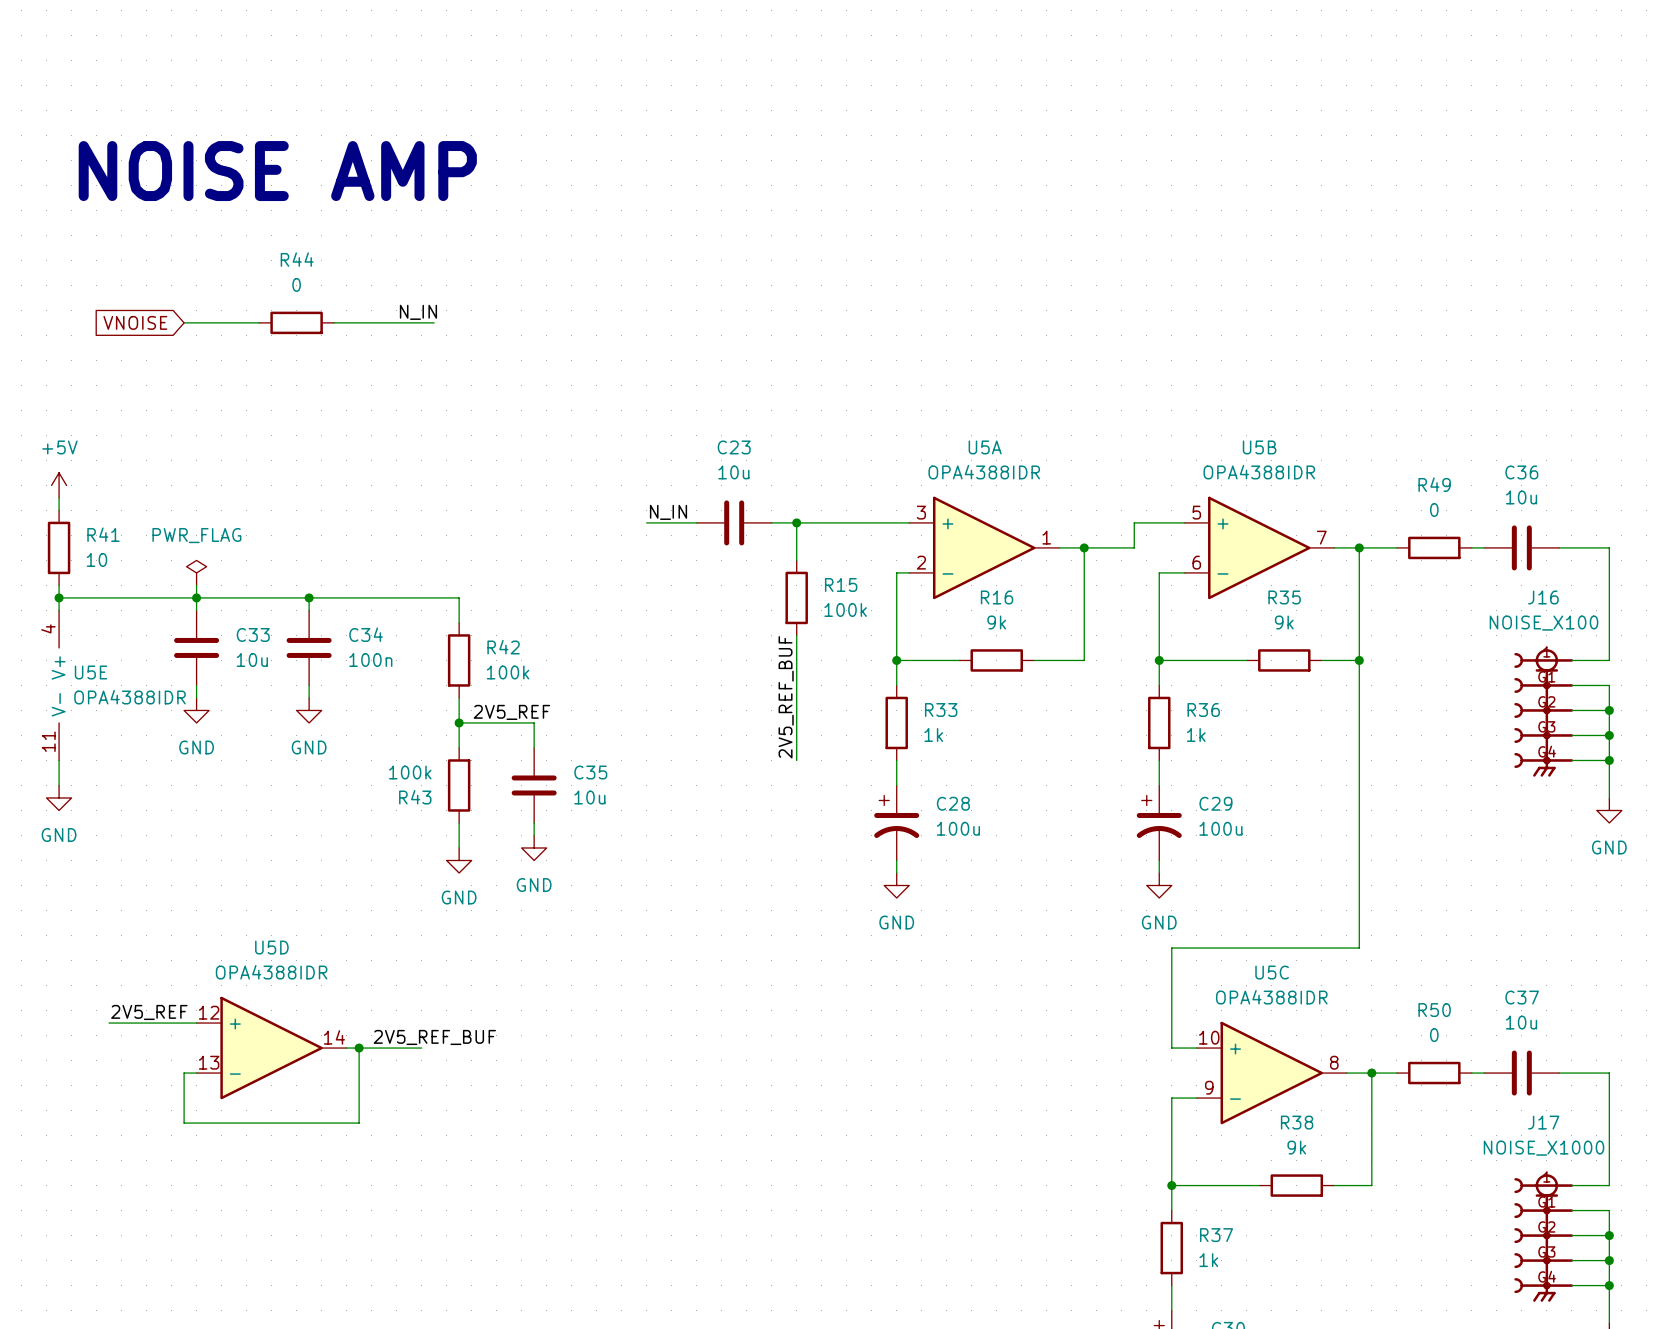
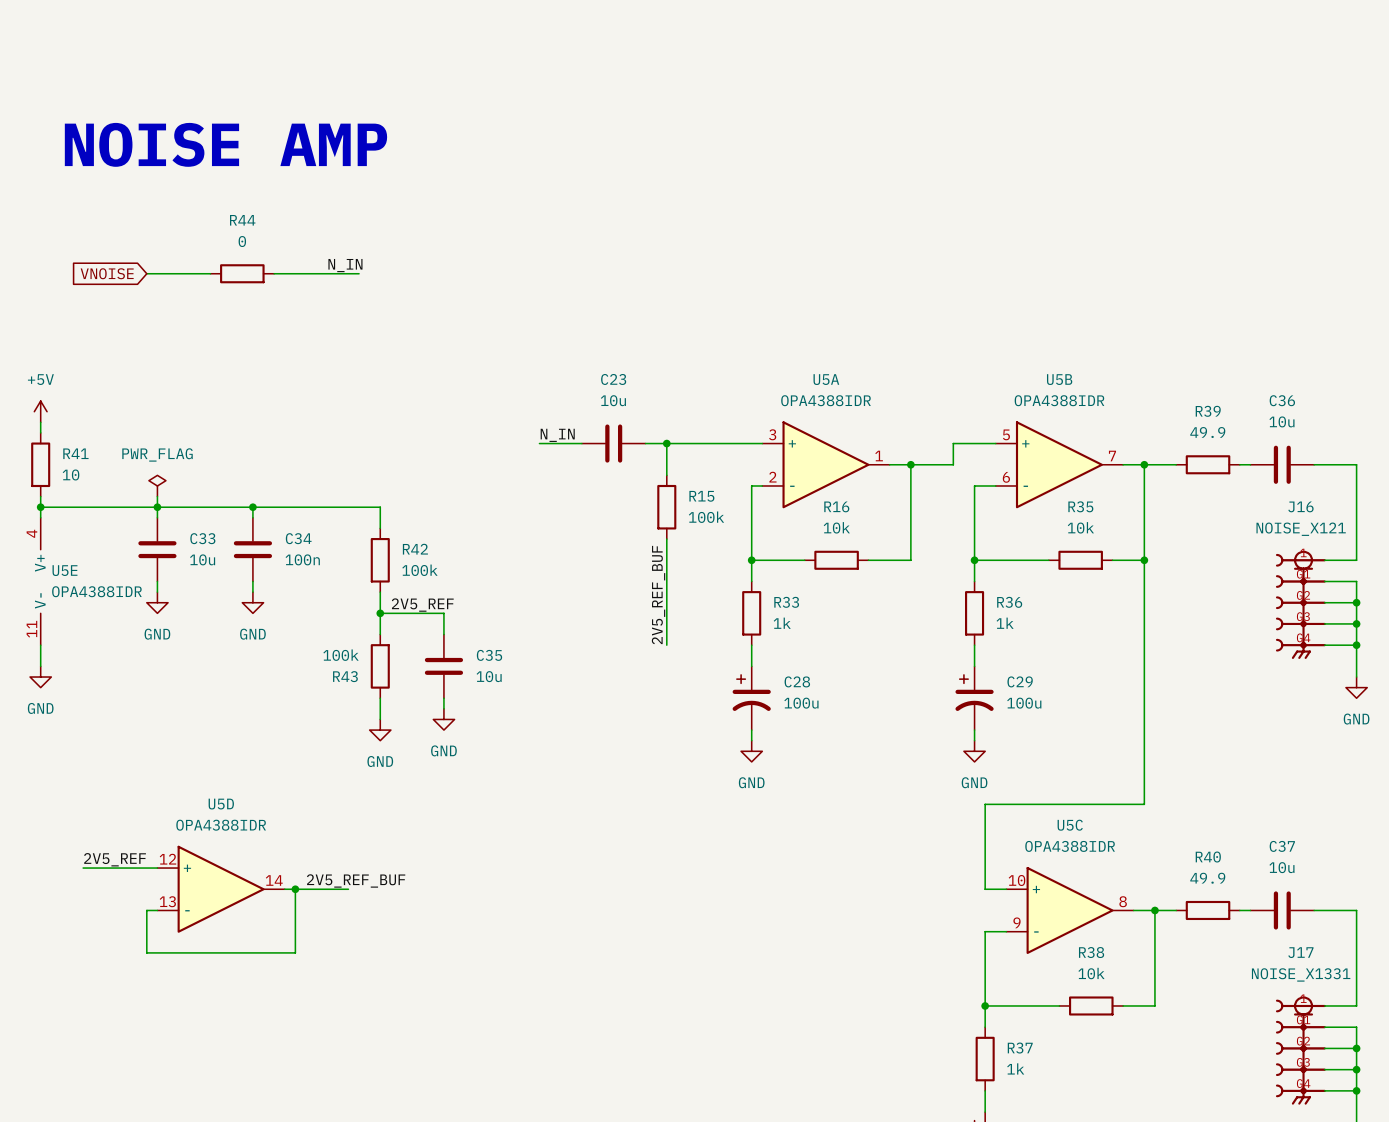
R49 name: R49 (1434, 484) -> R39 (1208, 411)
R49 value: 0 (1434, 509) -> 49.9 (1207, 432)
R16 value: 9k (996, 622) -> 10k (836, 527)
R35 value: 9k (1284, 622) -> 10k (1080, 527)
J16 value: NOISE_X100 (1544, 623) -> NOISE_X121 (1301, 529)
R50 name: R50 (1434, 1010) -> R40 (1208, 857)
R50 value: 0 (1434, 1035) -> 49.9 (1207, 878)
R38 value: 9k (1296, 1147) -> 10k (1091, 973)
J17 value: NOISE_X1000 (1544, 1148) -> NOISE_X1331 (1301, 974)

